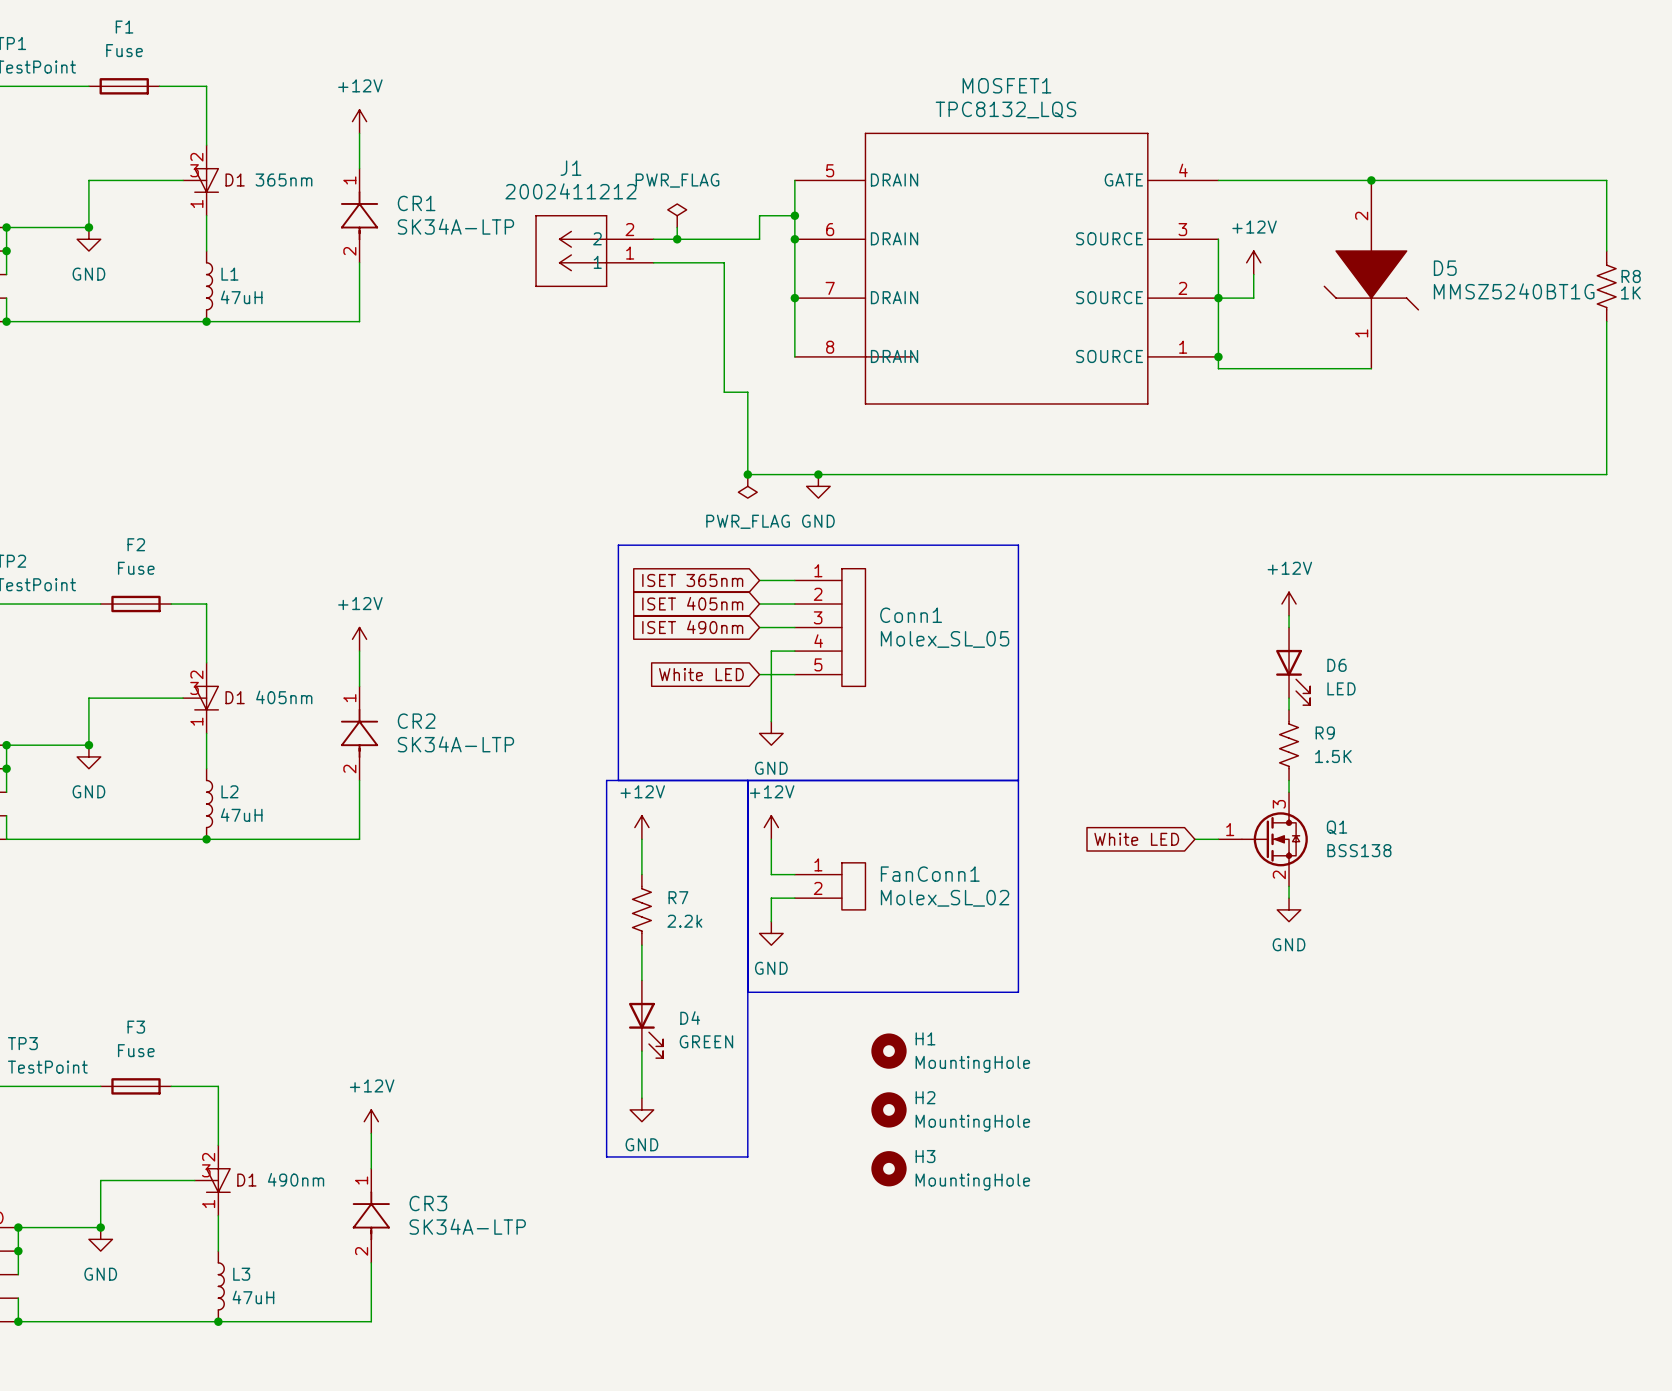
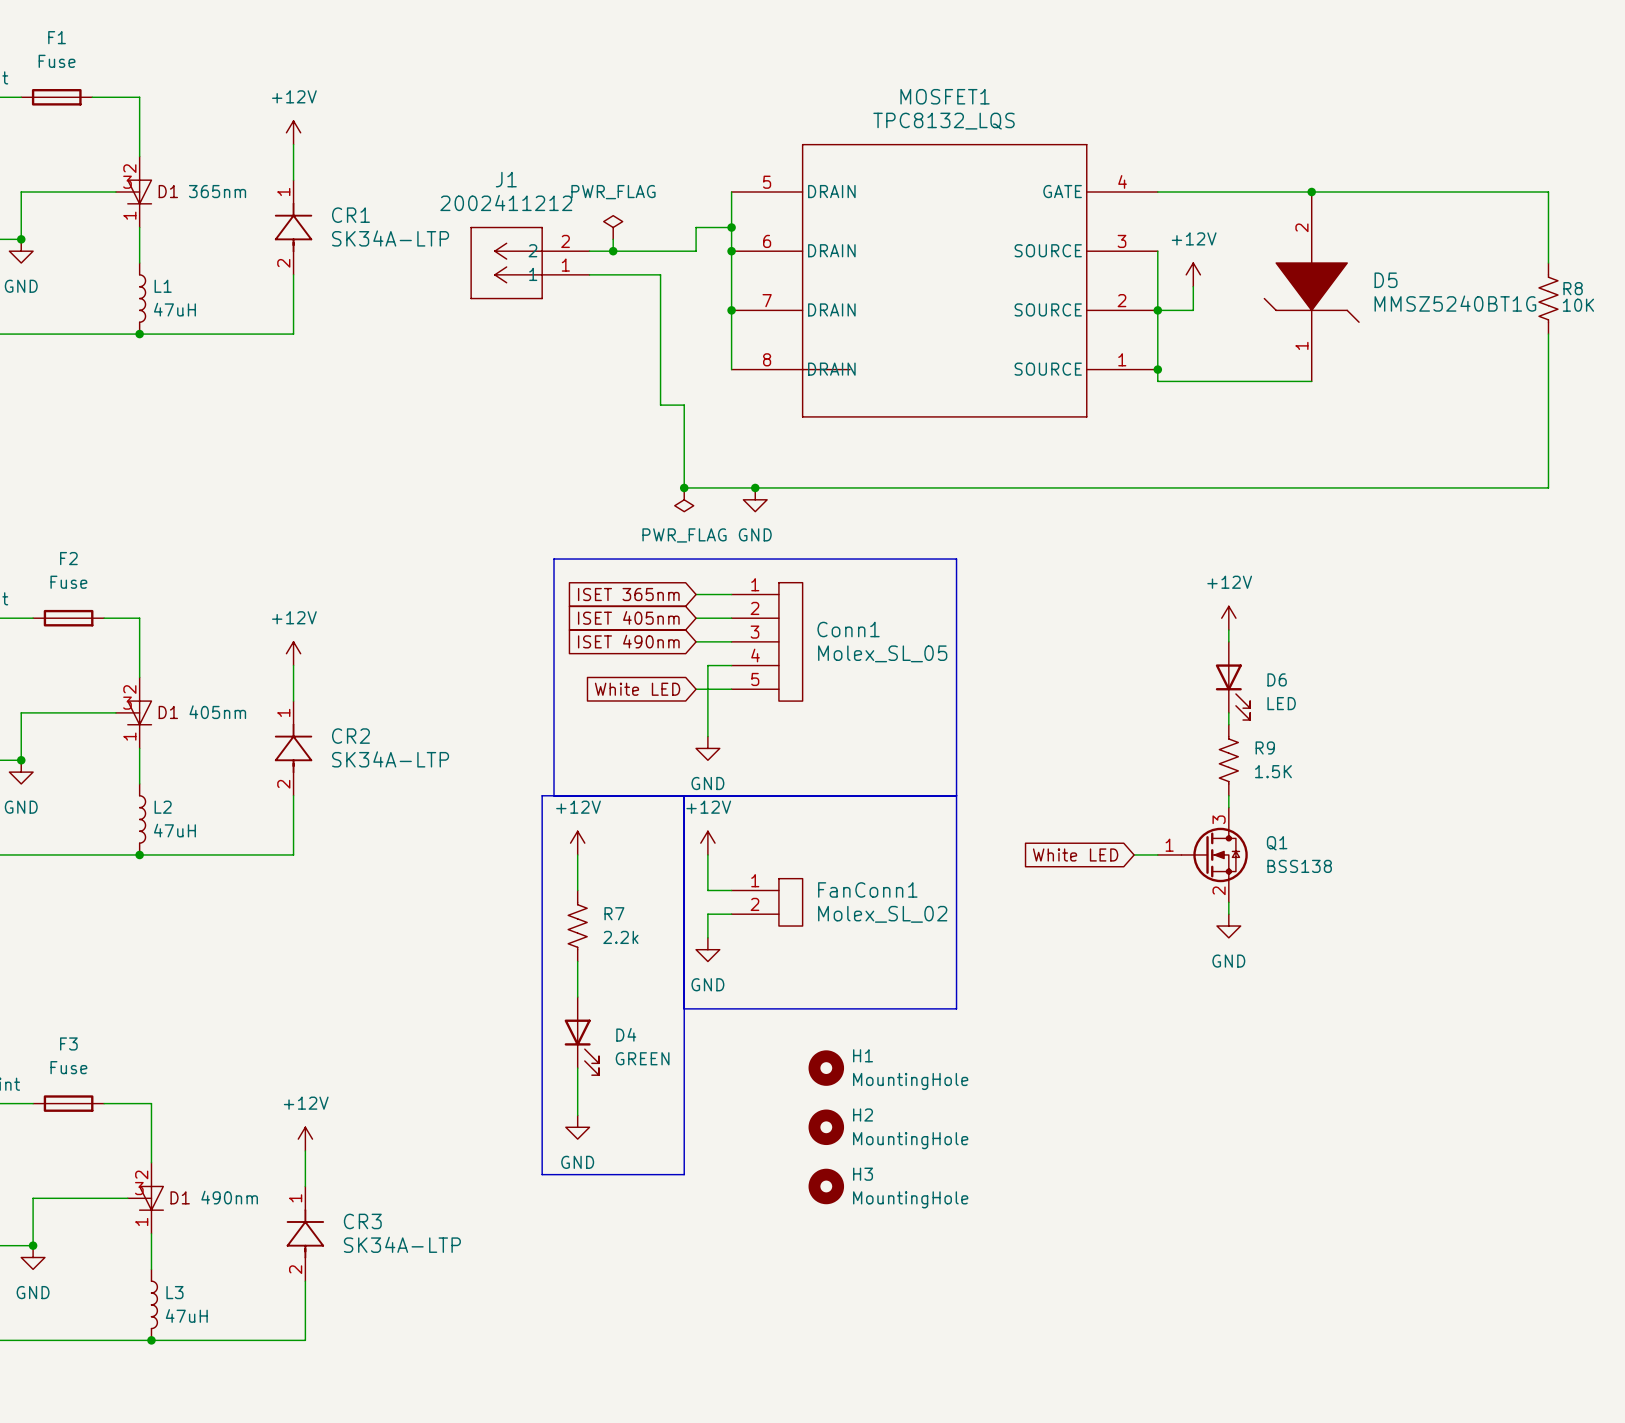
R8 value: 1K (1630, 292) -> 10K (1578, 305)

